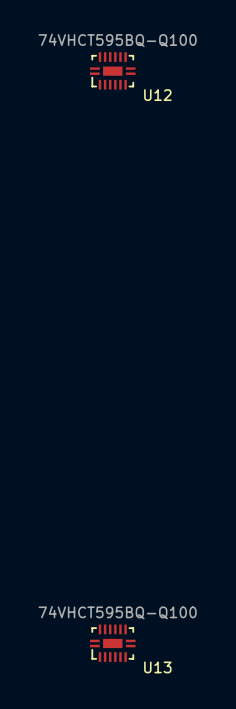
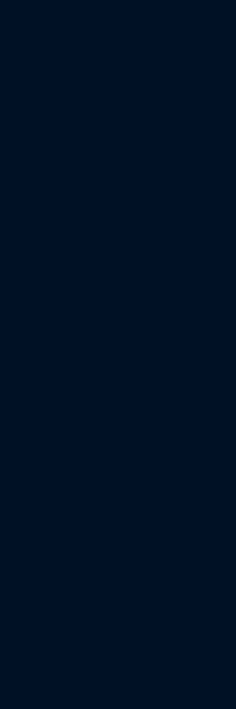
U12: 74VHCT595BQ-Q100 (112, 70) -> none
U13: 74VHCT595BQ-Q100 (112, 643) -> none

